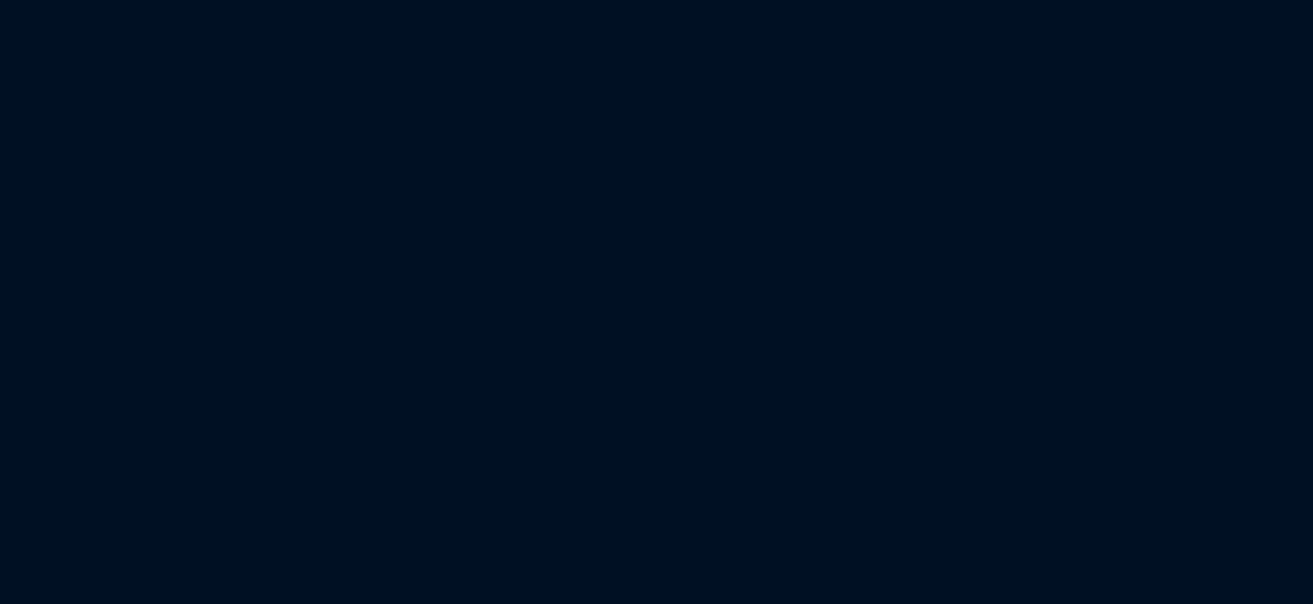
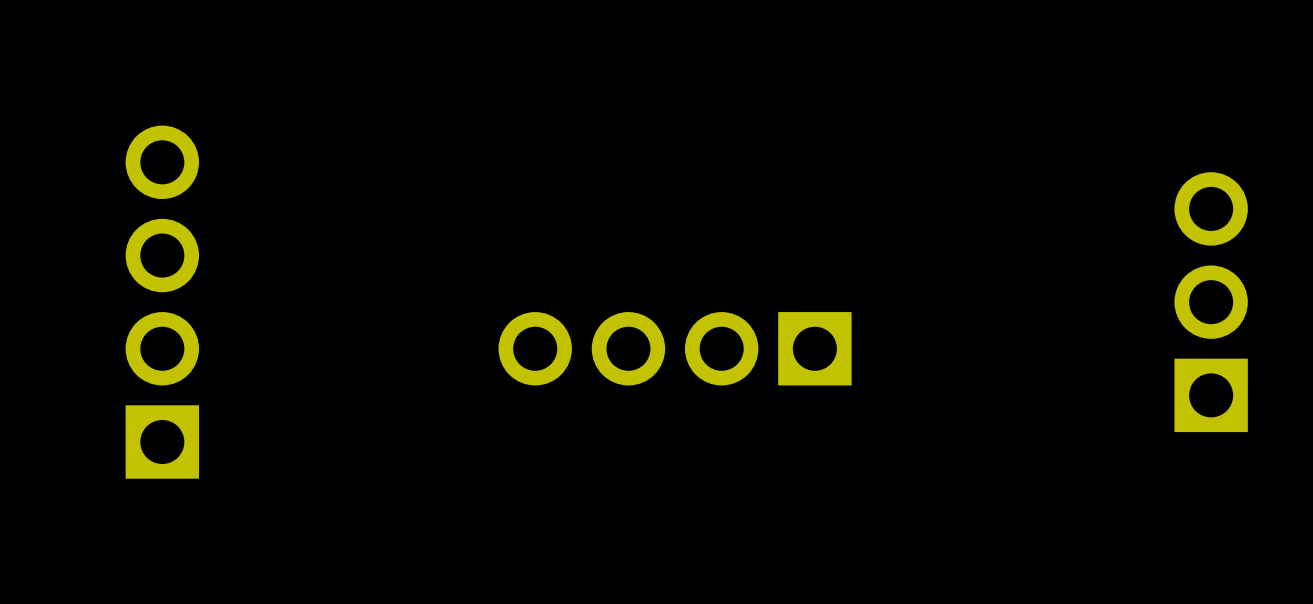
part: none -> (162, 302)
part: none -> (1211, 302)
part: none -> (675, 348)

